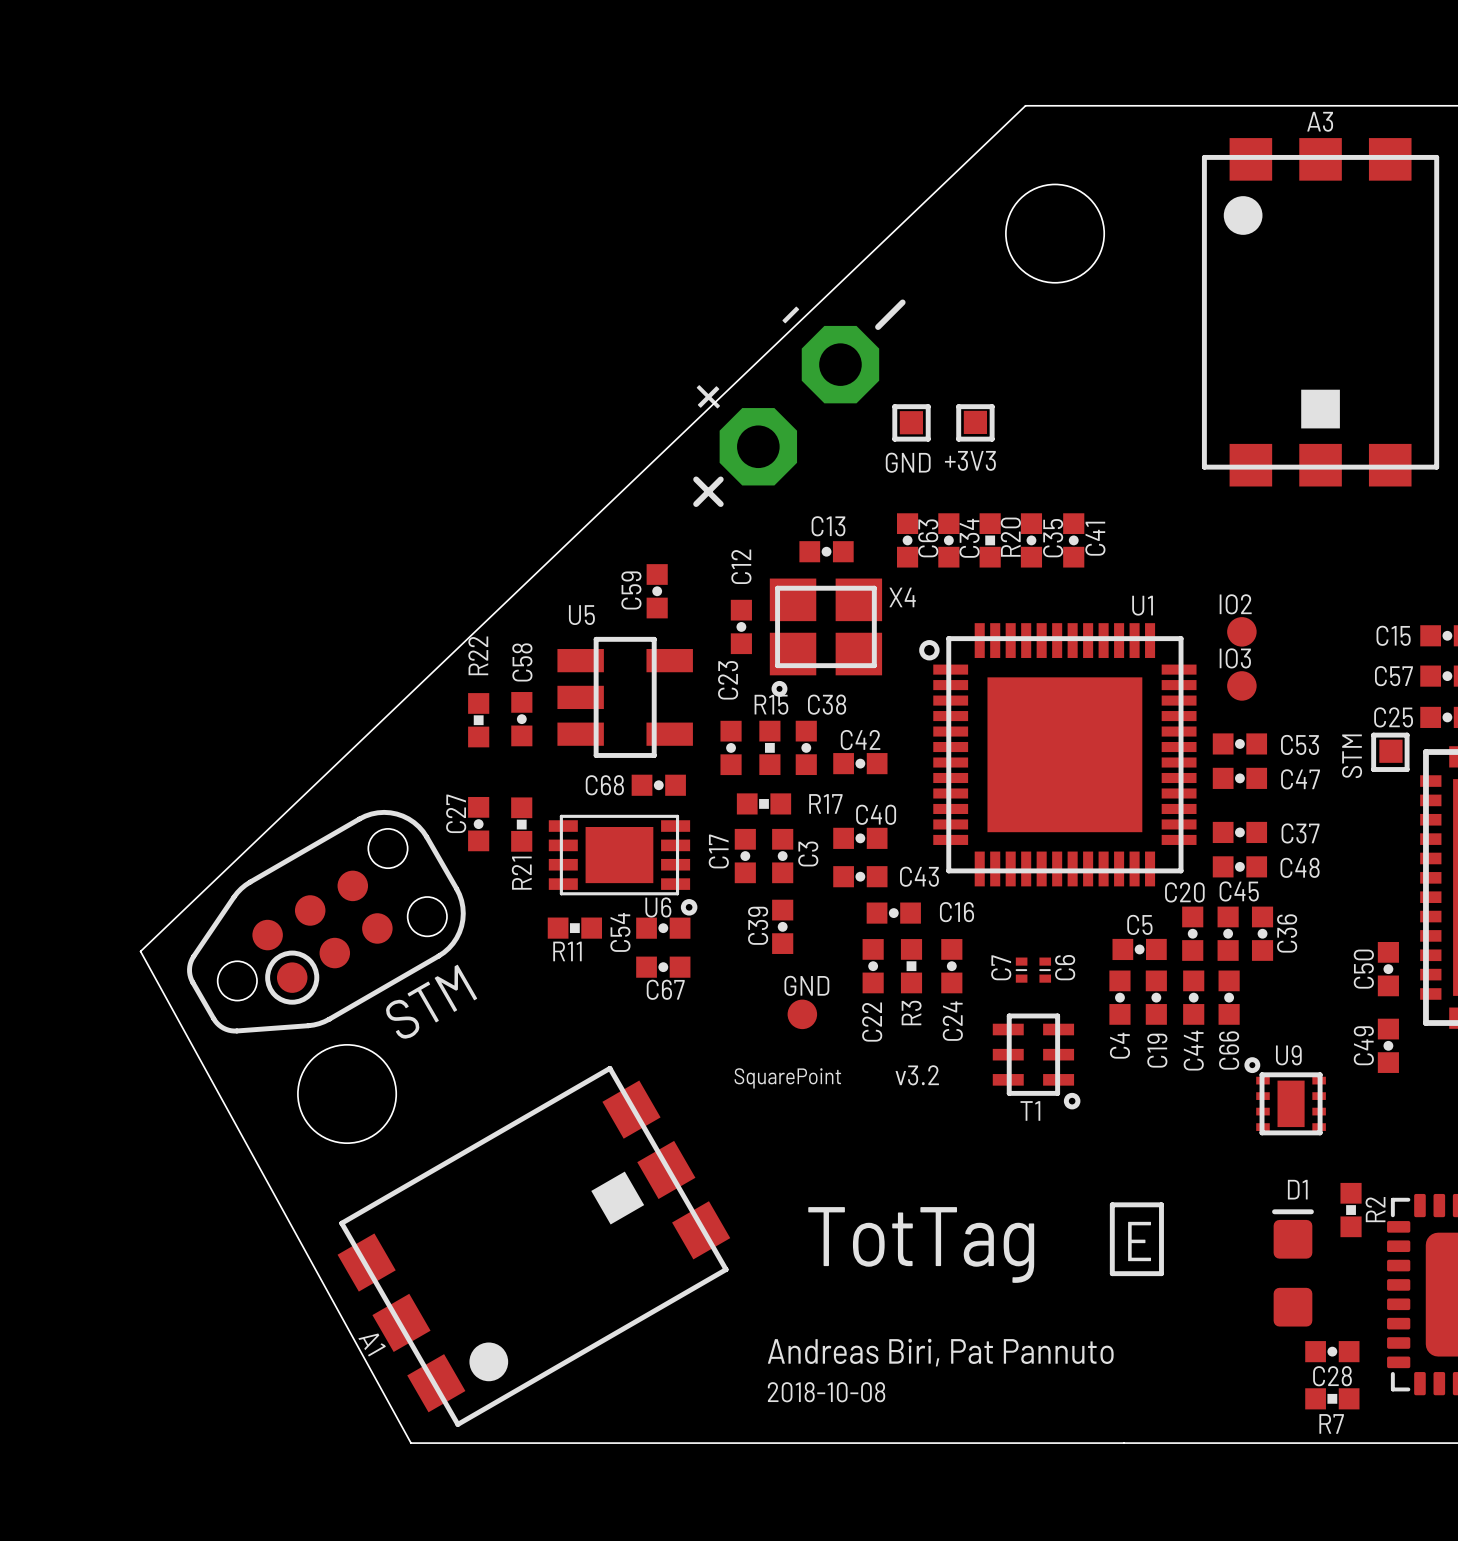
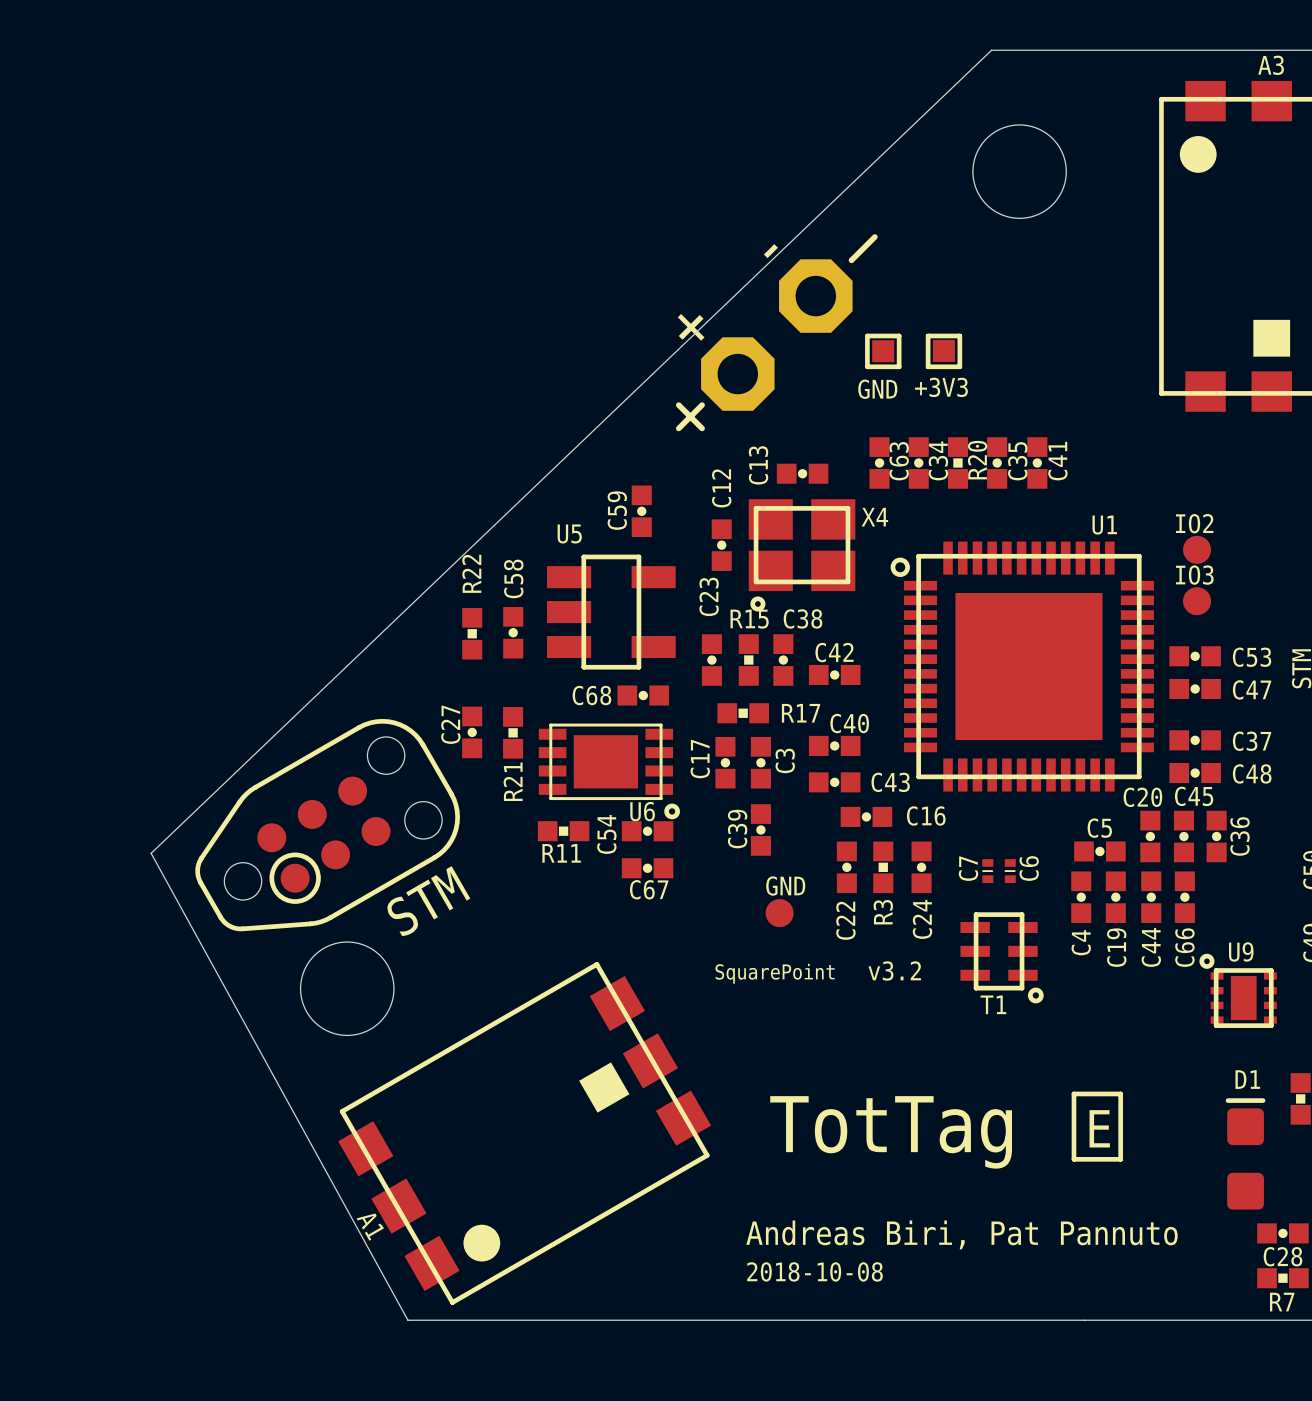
C13 name rotation: 0° (828, 526) -> 90° counterclockwise (758, 465)

